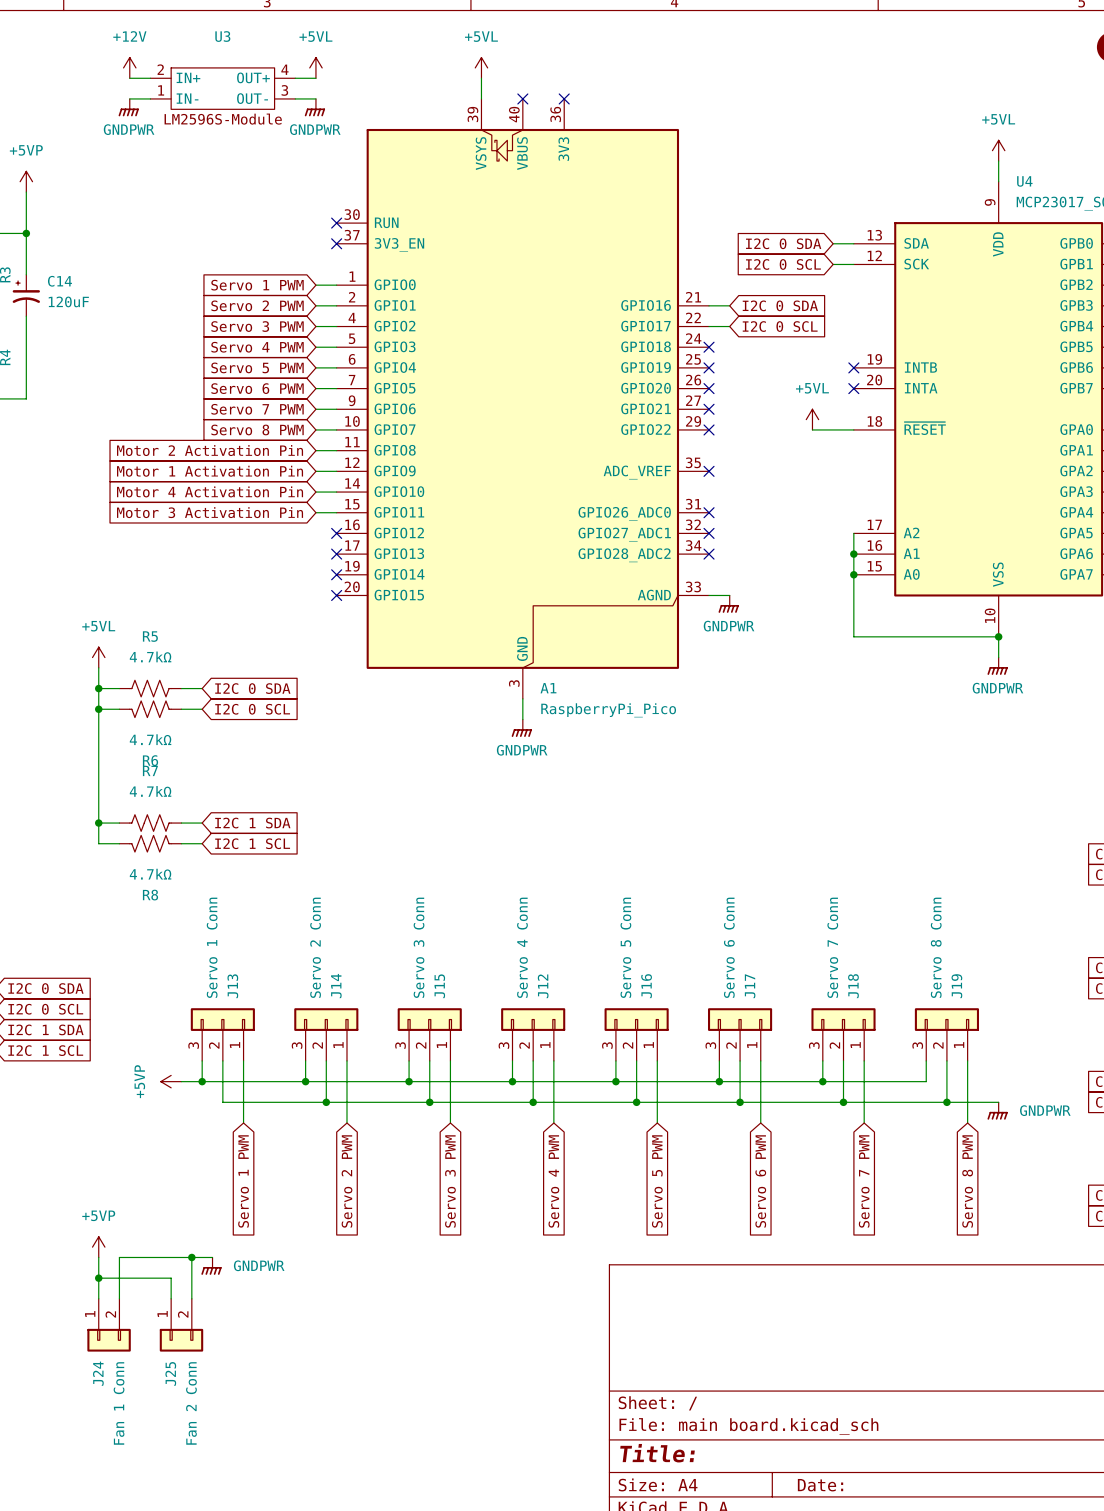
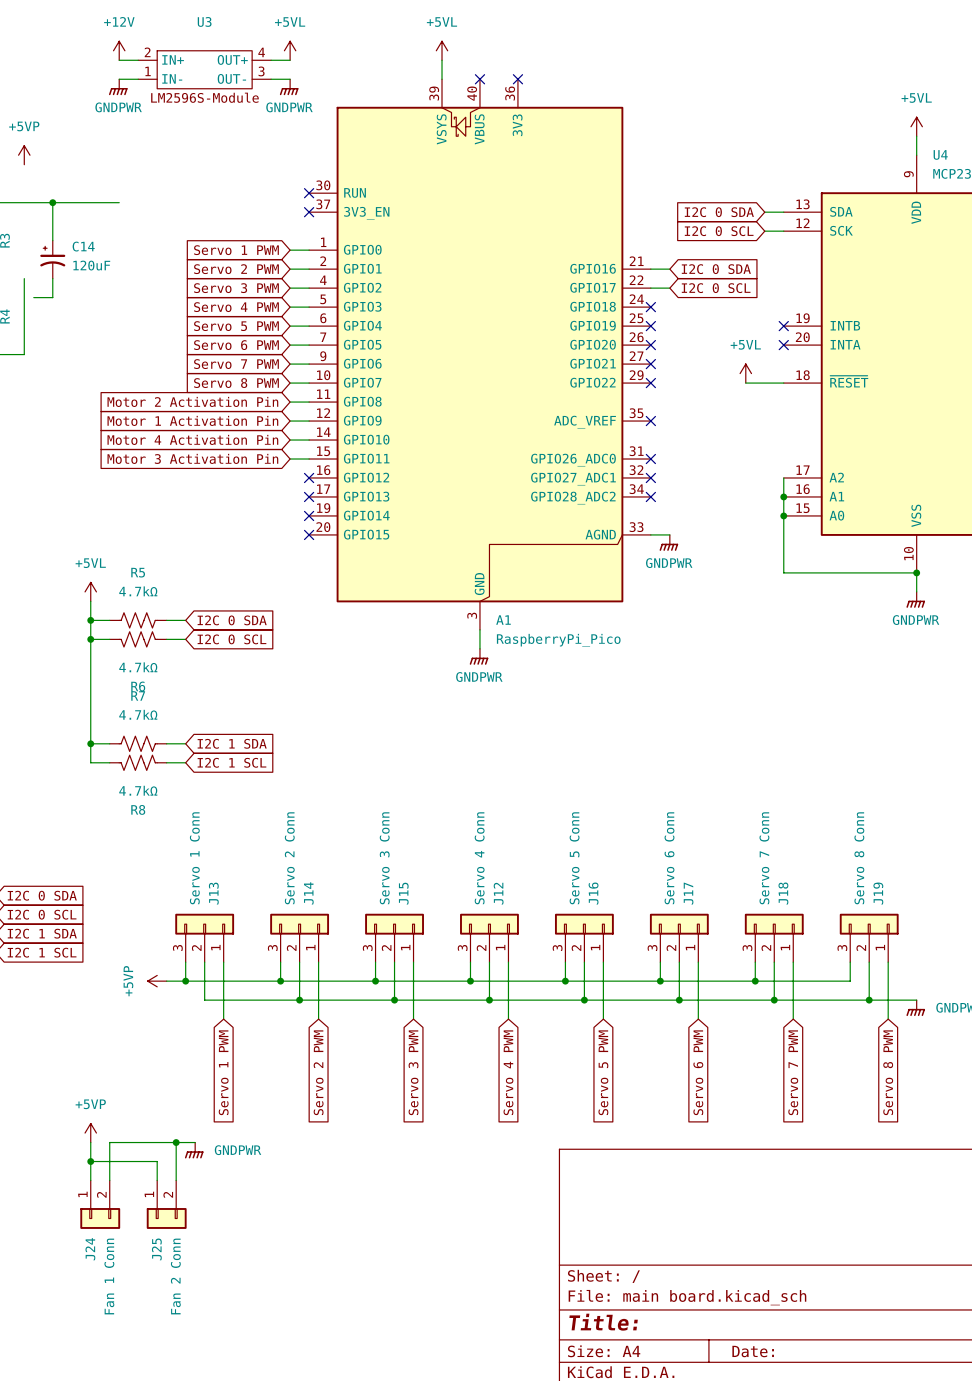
wire: (26, 192) (26, 274) -> none
wire: none -> (24, 202) (119, 202)
junction position: (26, 233) -> (52, 202)
wire: none -> (52, 202) (52, 240)
C14 position: (26, 295) -> (52, 259)
wire: none -> (52, 278) (52, 297) (33, 297)

